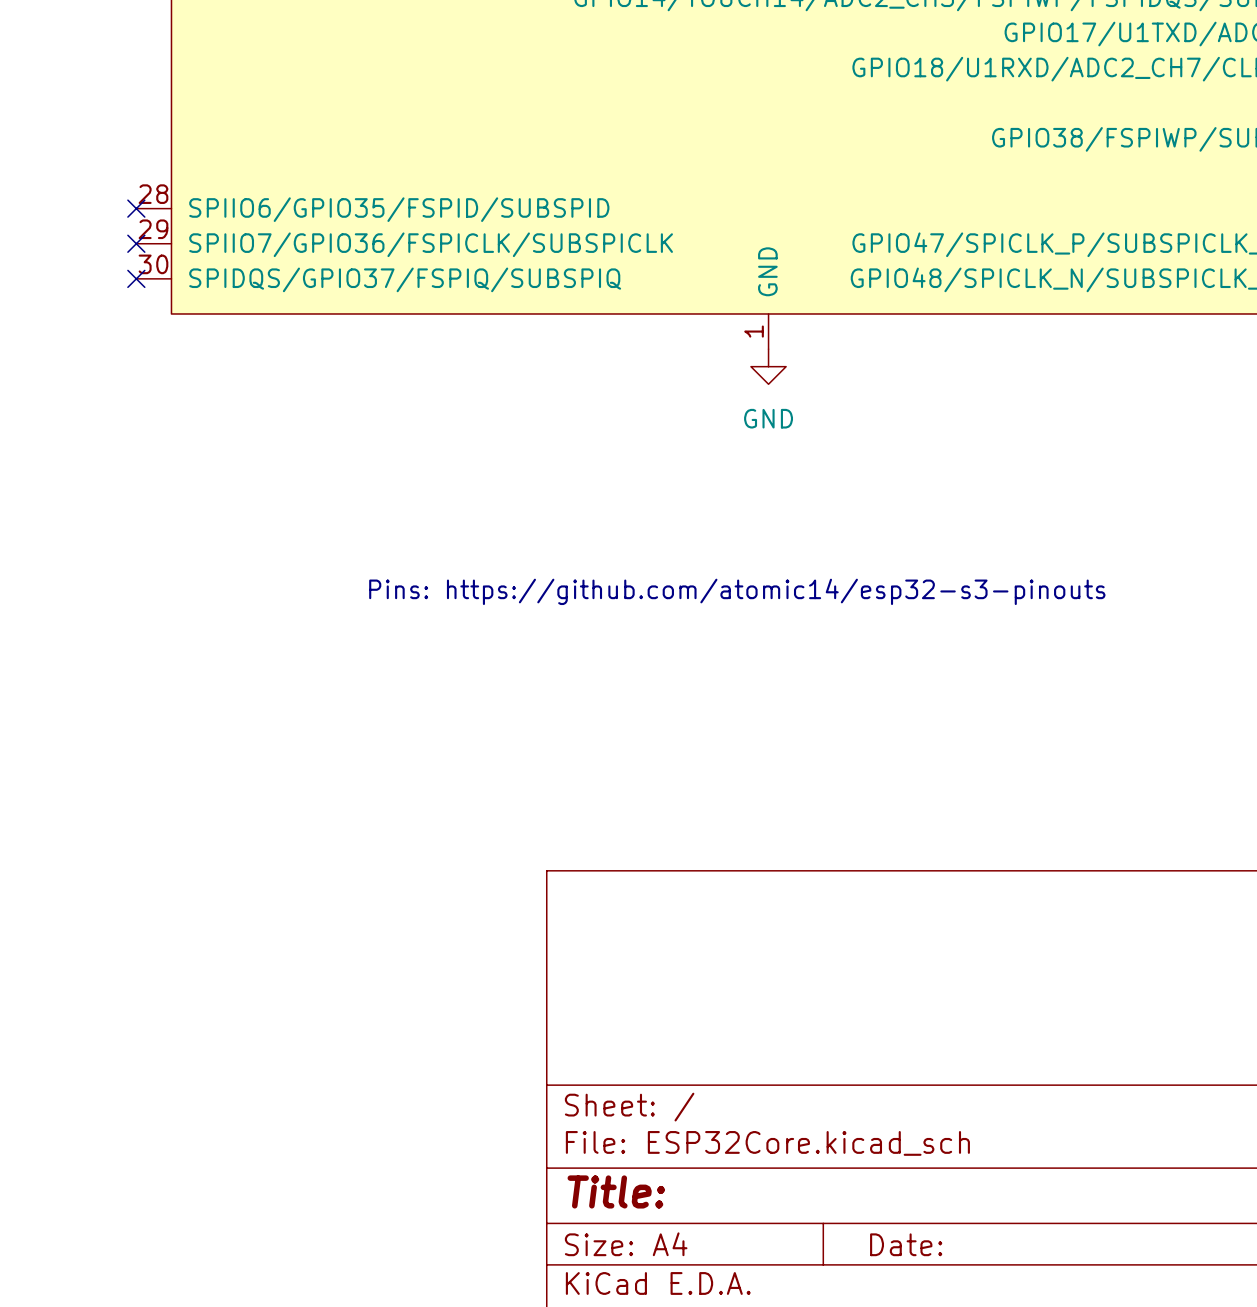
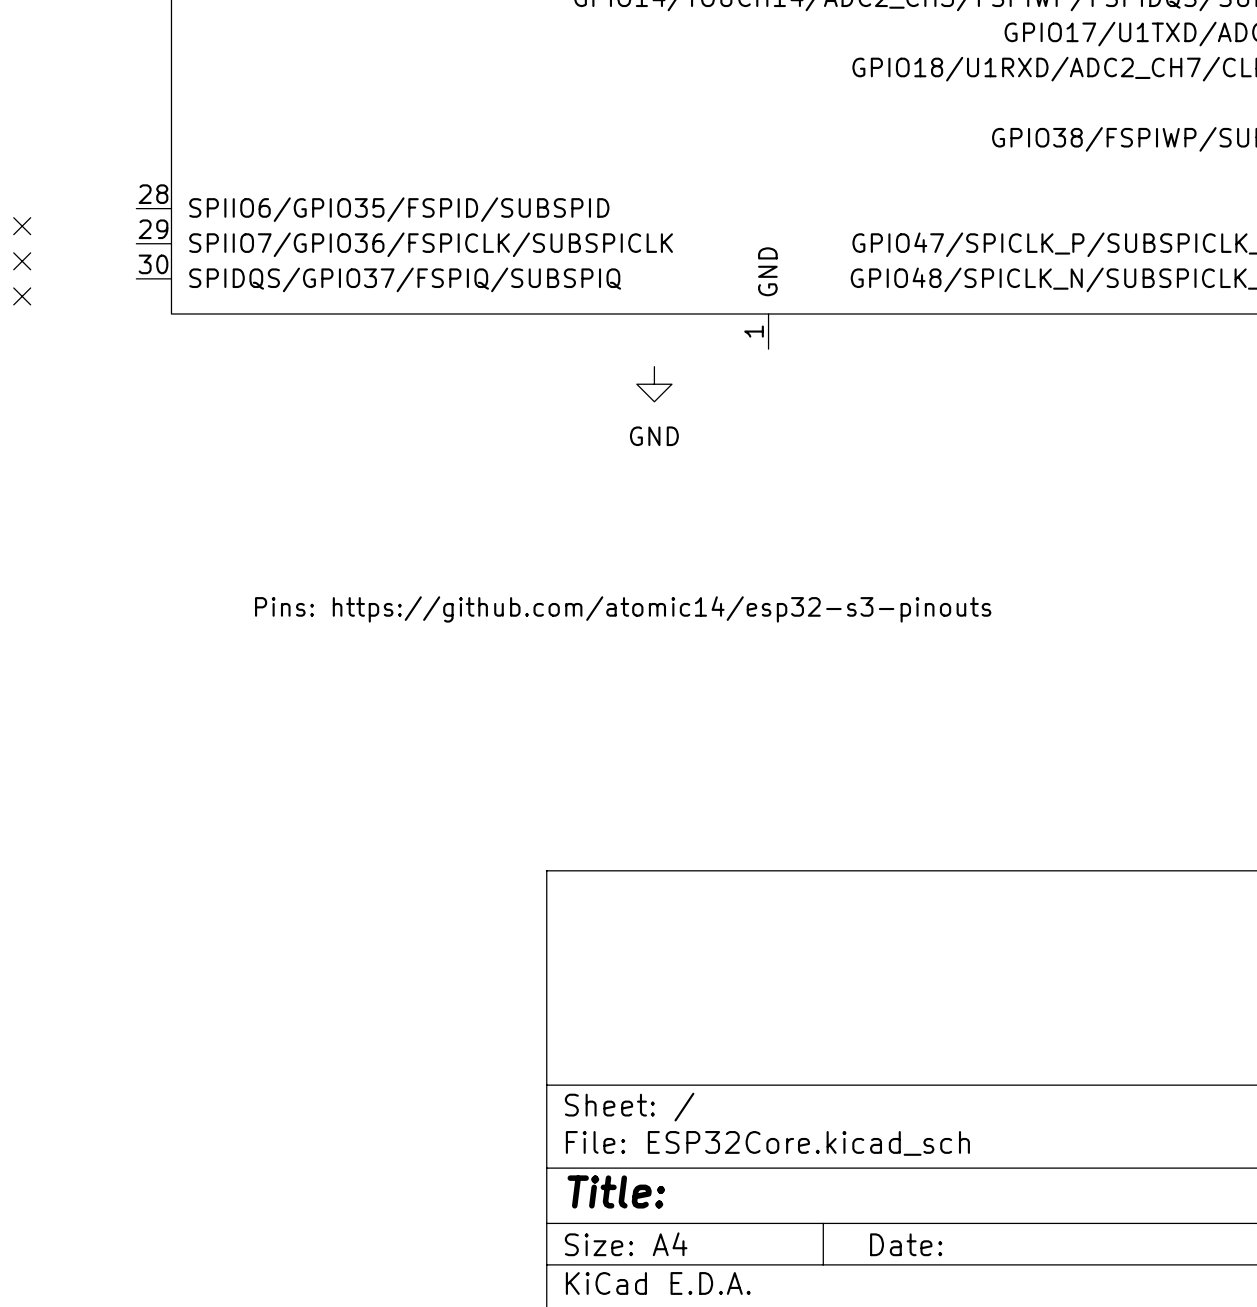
no-connect mark: (136, 208) -> none
no-connect mark: none -> (22, 226)
no-connect mark: (136, 243) -> none
no-connect mark: none -> (22, 261)
no-connect mark: (136, 278) -> none
no-connect mark: none -> (22, 296)
power symbol position: GND (768, 366) -> GND (654, 384)
text position: Pins: https://github.com/atomic14/esp32-s3-pinouts (737, 591) -> Pins: https://github.com/atomic14/esp32-s3-pinouts (623, 609)

